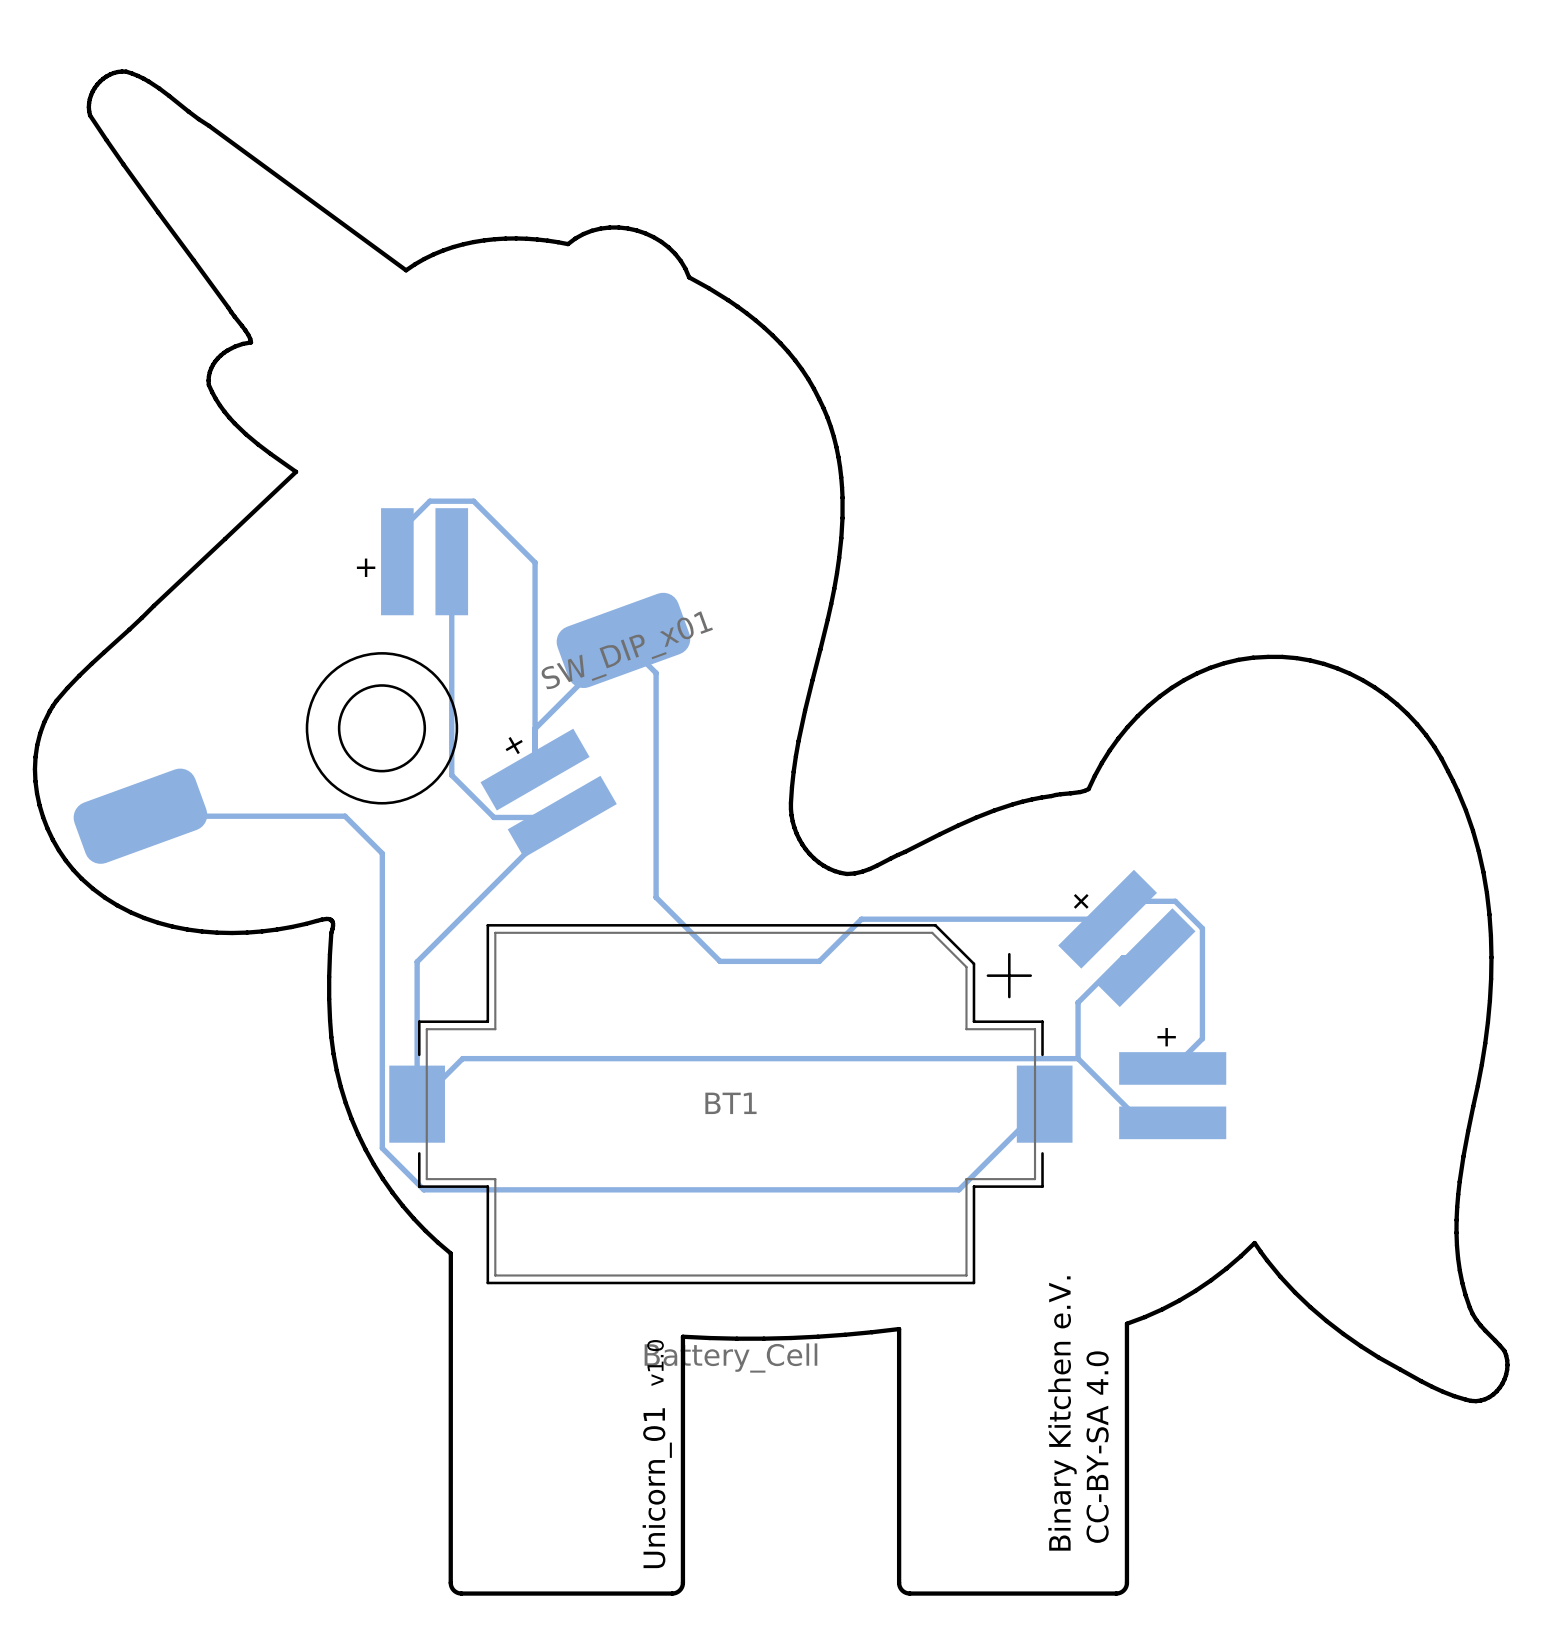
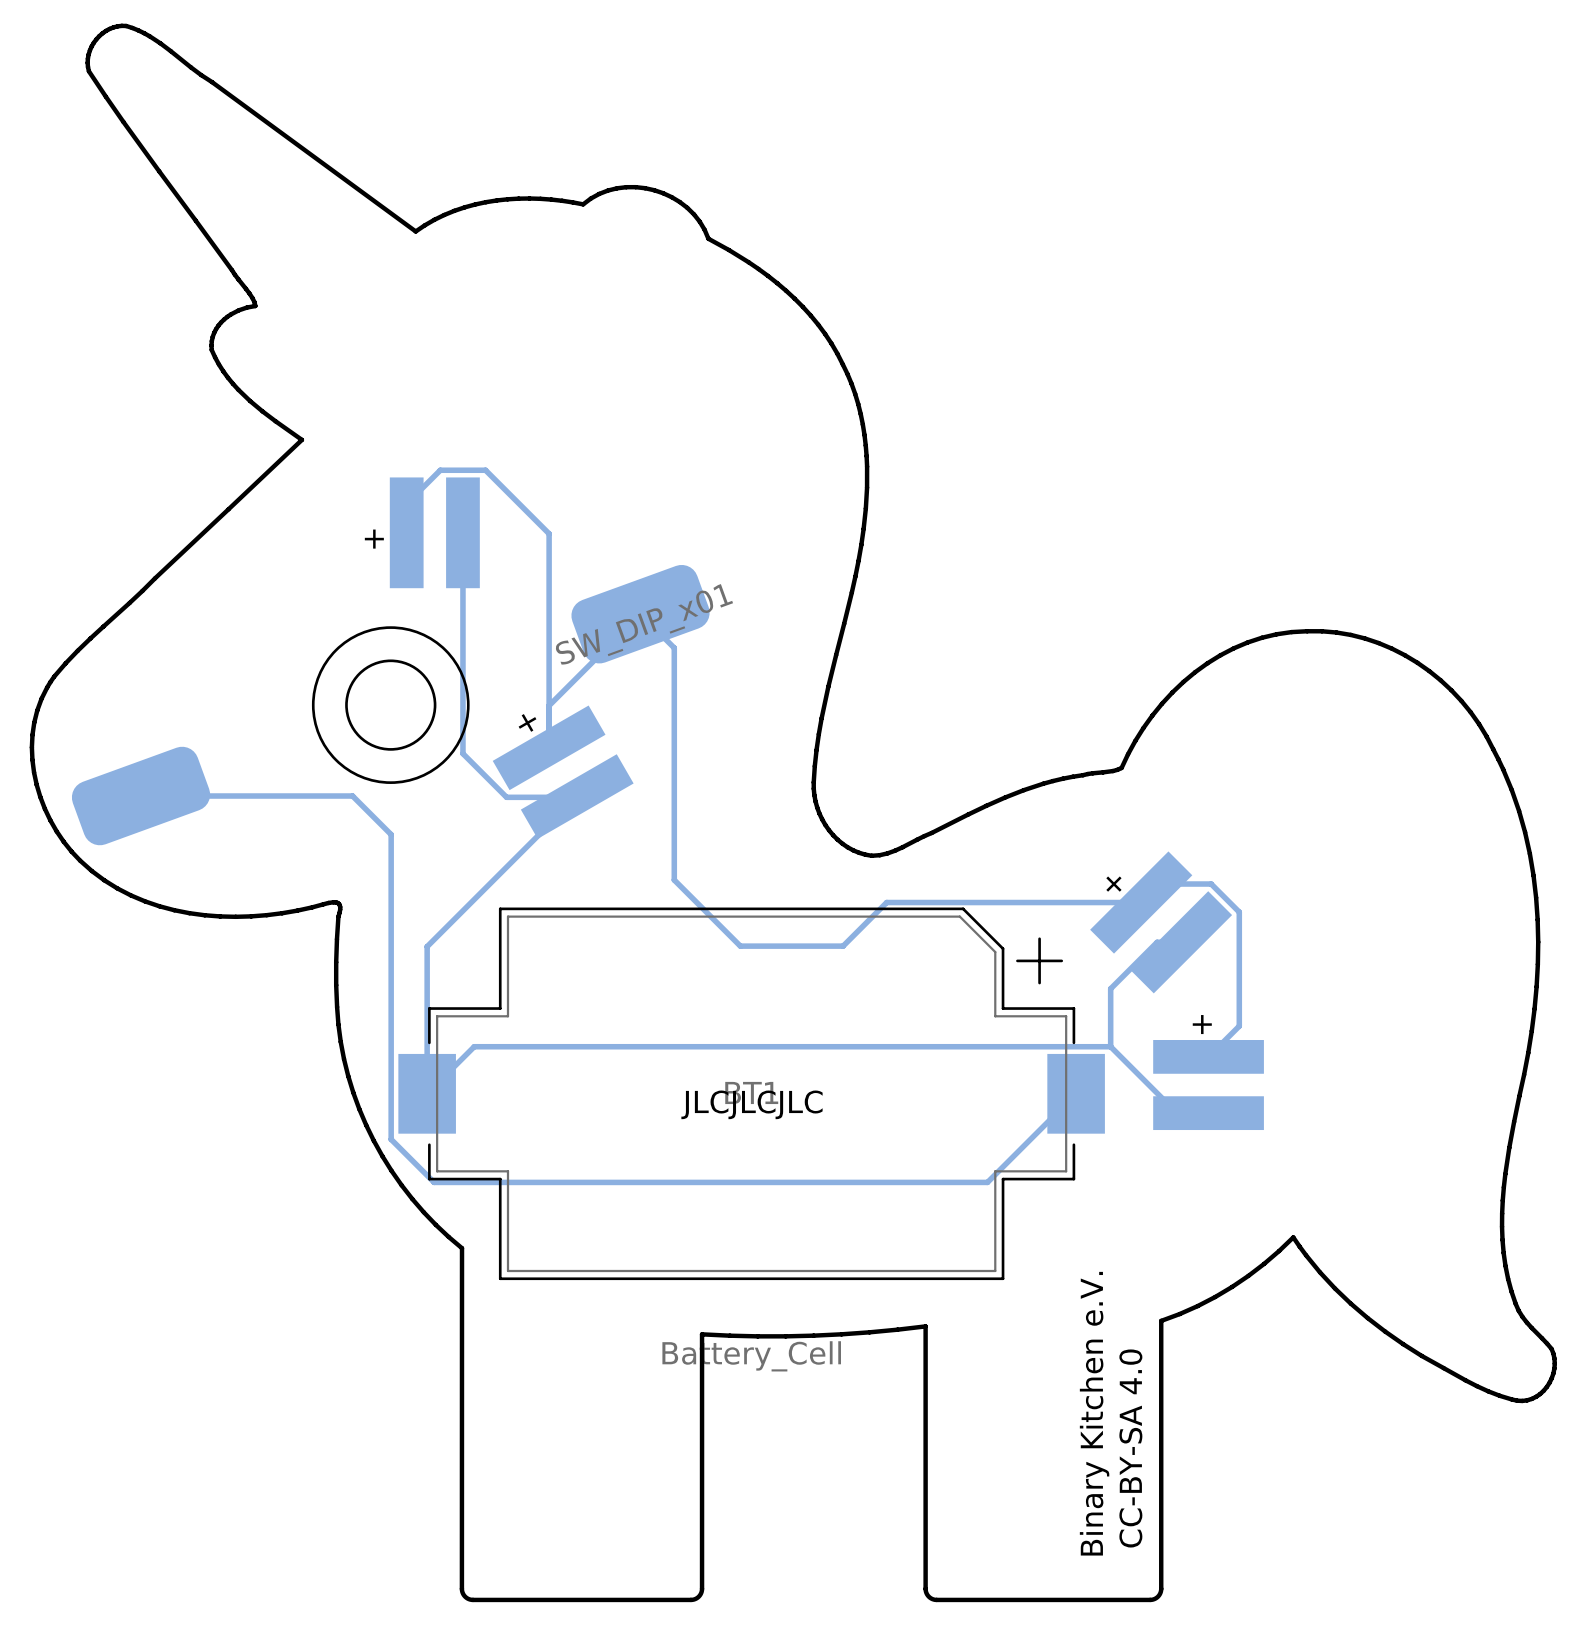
text: none -> JLCJLCJLC (751, 1104)
text: v1.0 (655, 1362) -> none
text: Unicorn_01 (657, 1488) -> none

